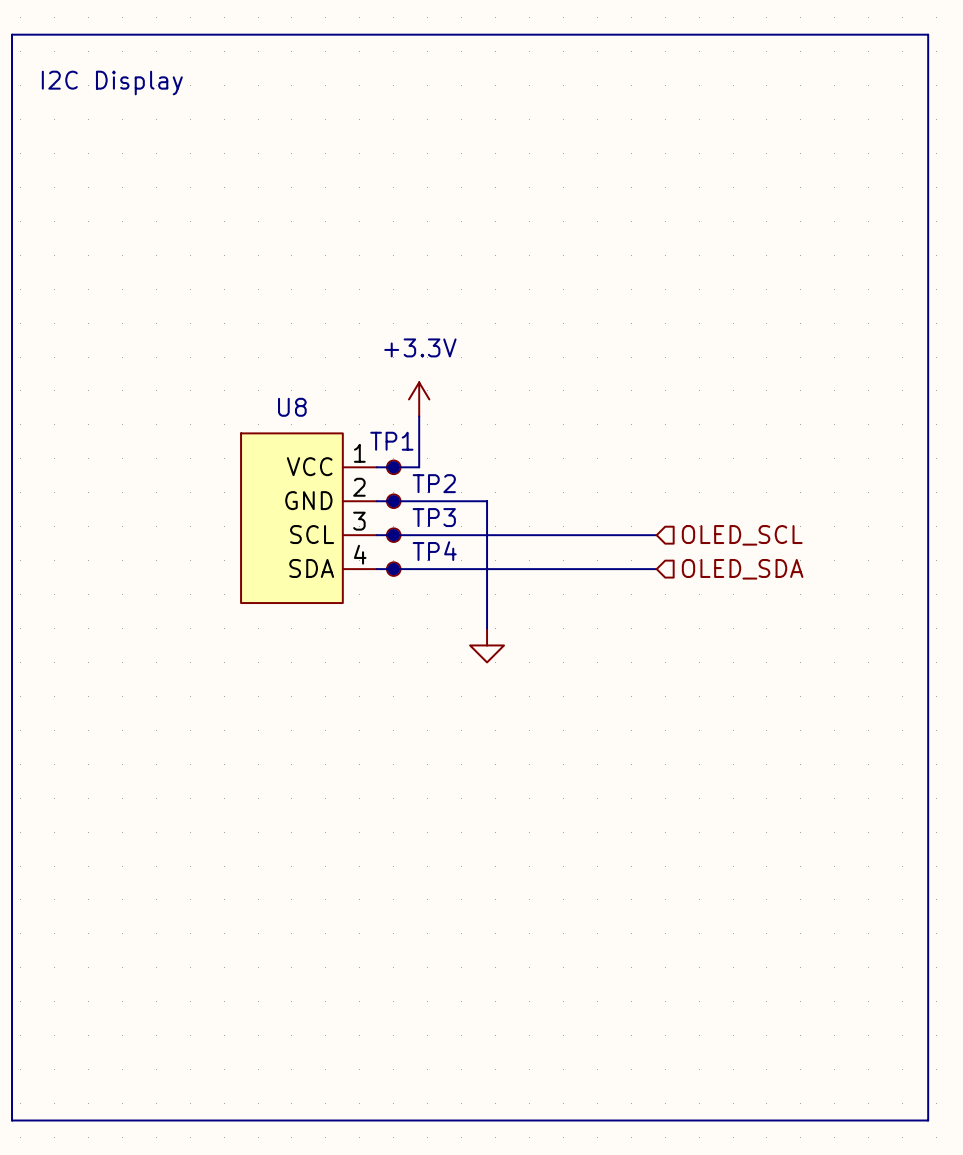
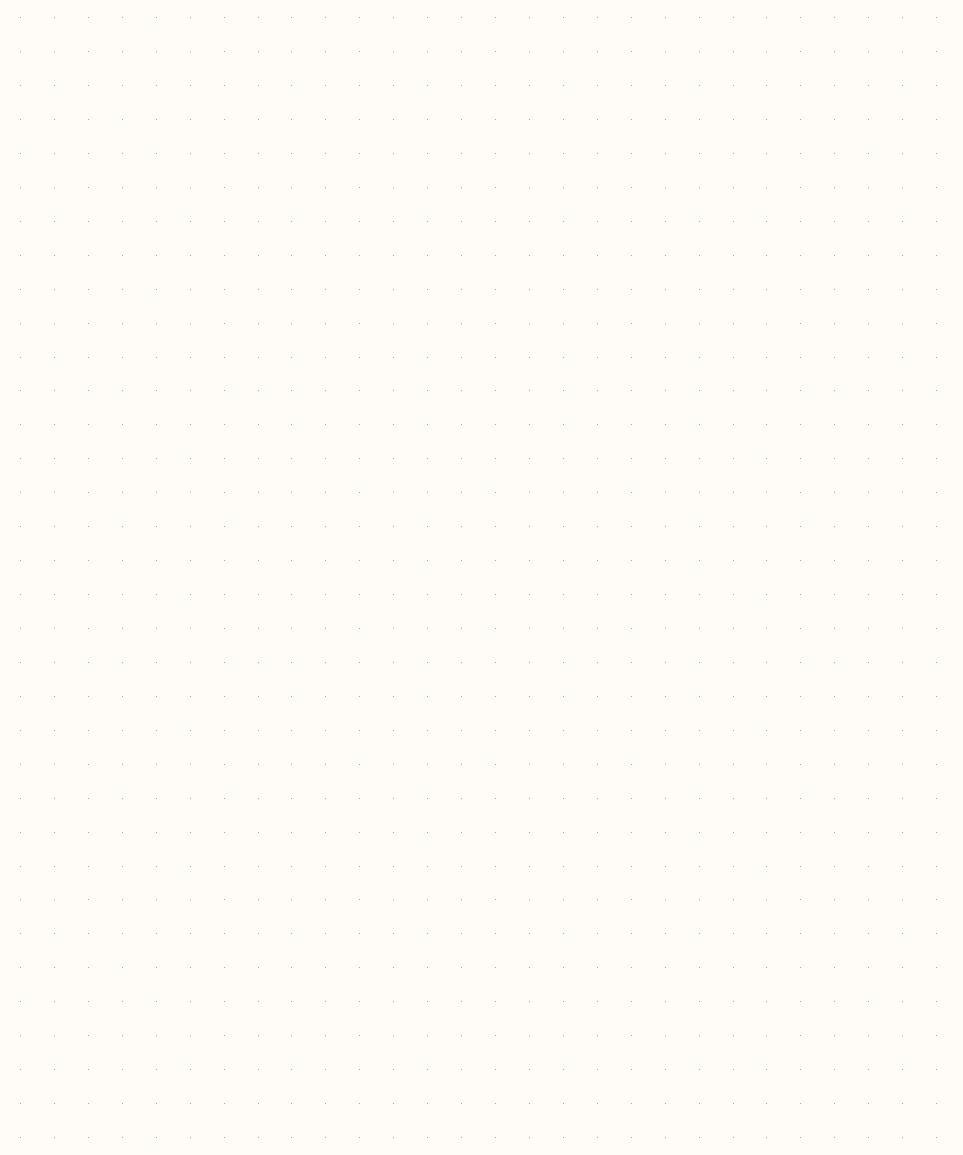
line: (12, 34) (928, 34) (928, 1120) (12, 1120) (12, 34) -> none
text: I2C Display (112, 82) -> none
power symbol: +3.3V (419, 399) -> none
wire: (419, 416) (419, 467) (376, 467) -> none
junction: (393, 467) -> none
TP1: (393, 467) -> none
wire: (376, 501) (487, 501) (487, 628) -> none
junction: (393, 501) -> none
TP2: (393, 501) -> none
U8: (308, 518) -> none
wire: (376, 535) (656, 535) -> none
junction: (393, 535) -> none
TP3: (393, 535) -> none
hierarchical label: OLED_SCL (742, 535) -> none
wire: (376, 569) (656, 569) -> none
junction: (393, 569) -> none
TP4: (393, 569) -> none
hierarchical label: OLED_SDA (742, 569) -> none
power symbol: (487, 645) -> none

